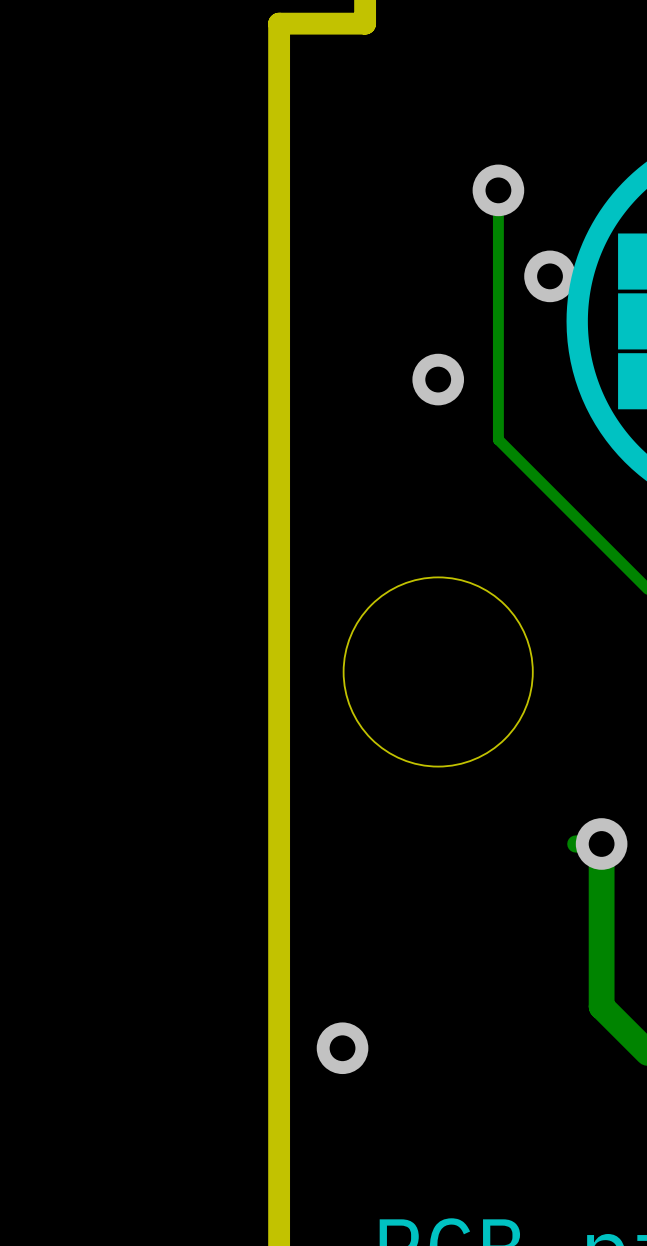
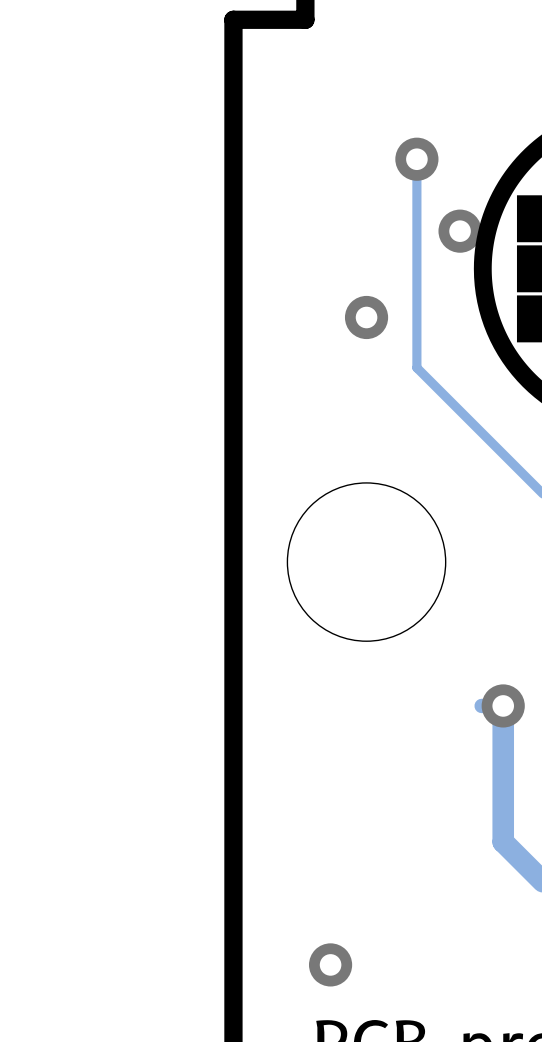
via position: (342, 1048) -> (330, 964)

